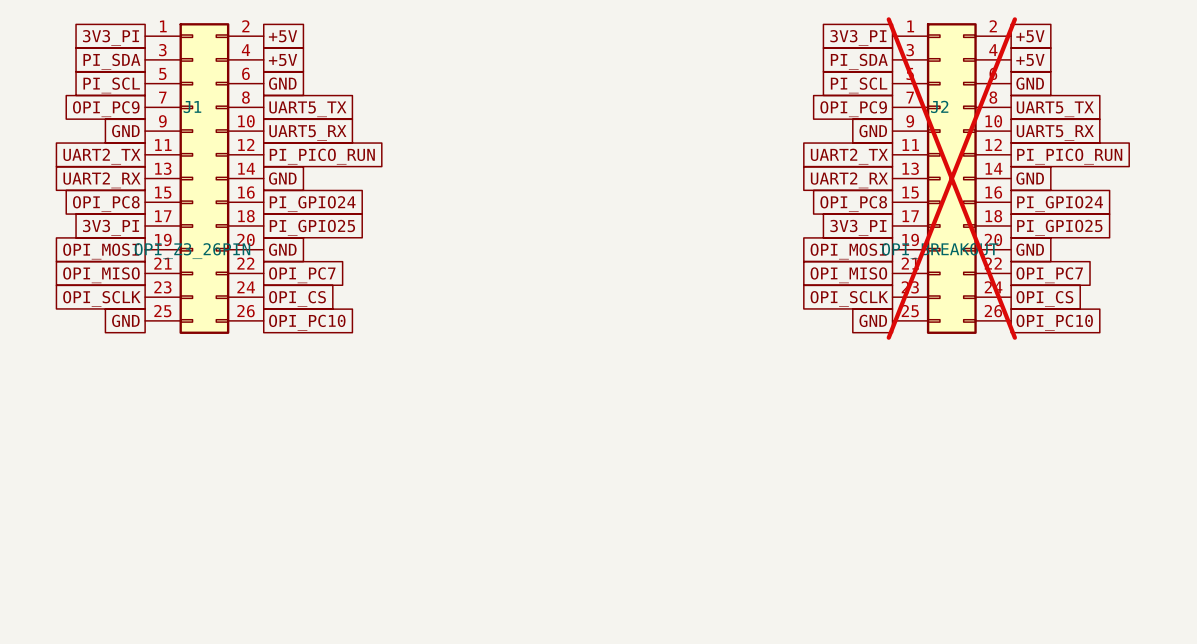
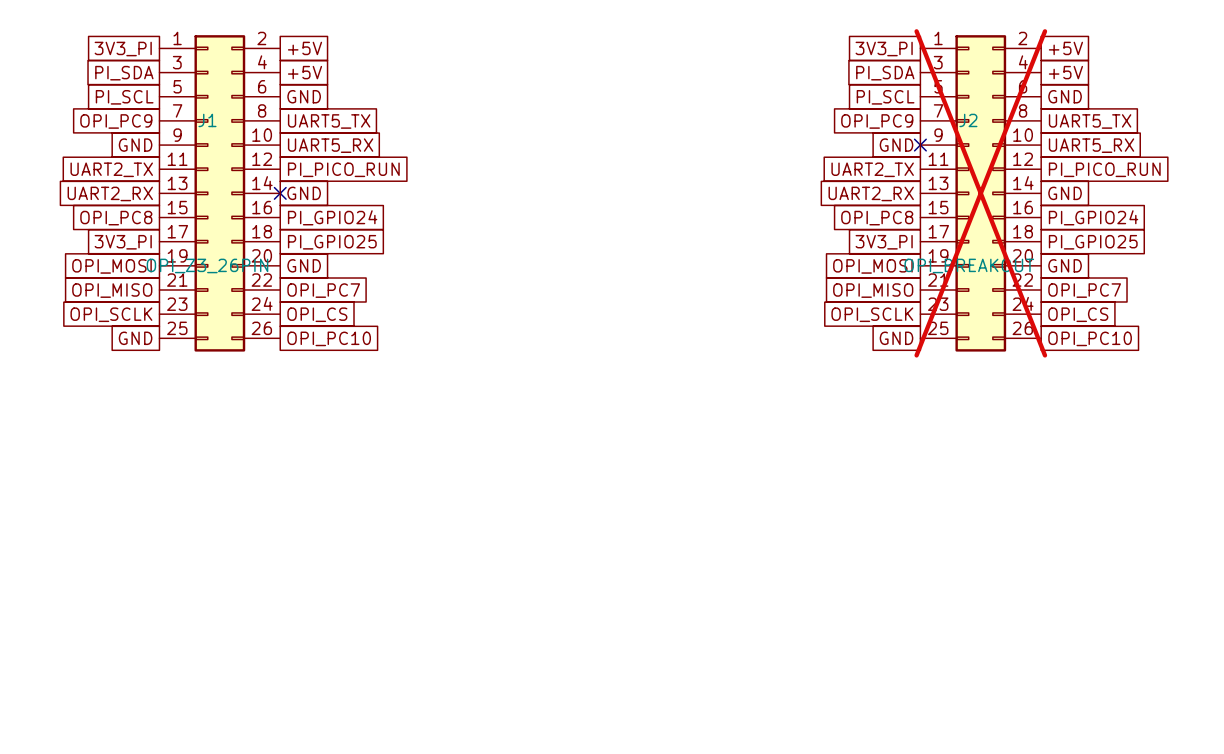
no-connect mark: none -> (920, 145)
no-connect mark: none -> (280, 193)

